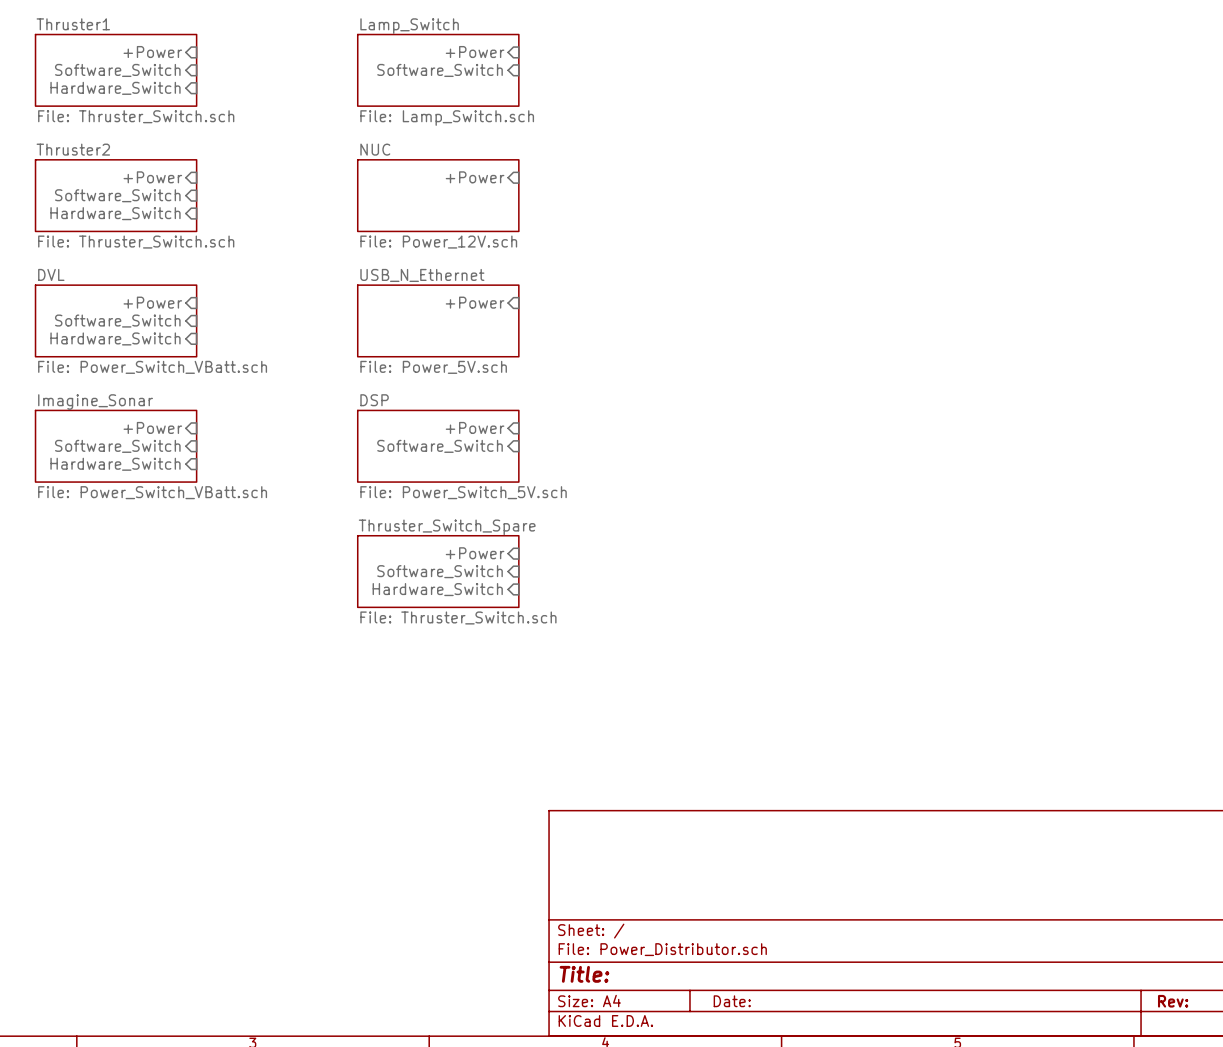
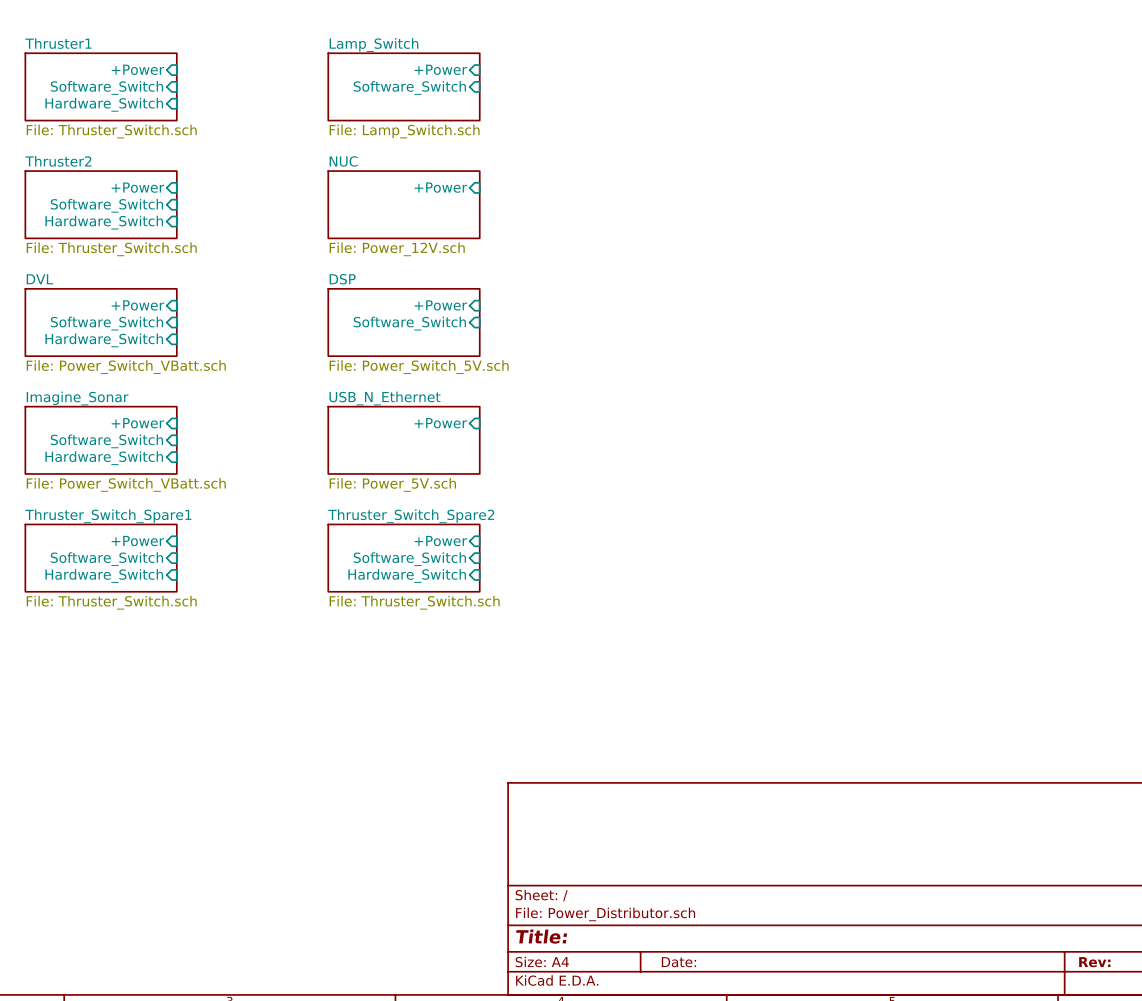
sheet USB_N_Ethernet name: USB_N_Ethernet (422, 275) -> DSP (342, 279)
sheet USB_N_Ethernet value: File: Power_5V.sch (433, 367) -> File: Power_Switch_5V.sch (419, 367)
sheet DSP name: DSP (374, 400) -> USB_N_Ethernet (384, 398)
sheet pin position: Software_Switch (440, 446) -> Software_Switch (409, 323)
sheet DSP value: File: Power_Switch_5V.sch (463, 492) -> File: Power_5V.sch (392, 484)
sheet Thruster_Switch_Spare name: Thruster_Switch_Spare (447, 527) -> Thruster_Switch_Spare2 (411, 516)
sheet pin: none -> +Power (137, 541)
sheet Thruster_Switch_Spare1: none -> File: Thruster_Switch.sch (101, 558)
sheet pin: none -> Software_Switch (106, 559)
sheet pin: none -> Hardware_Switch (104, 575)

